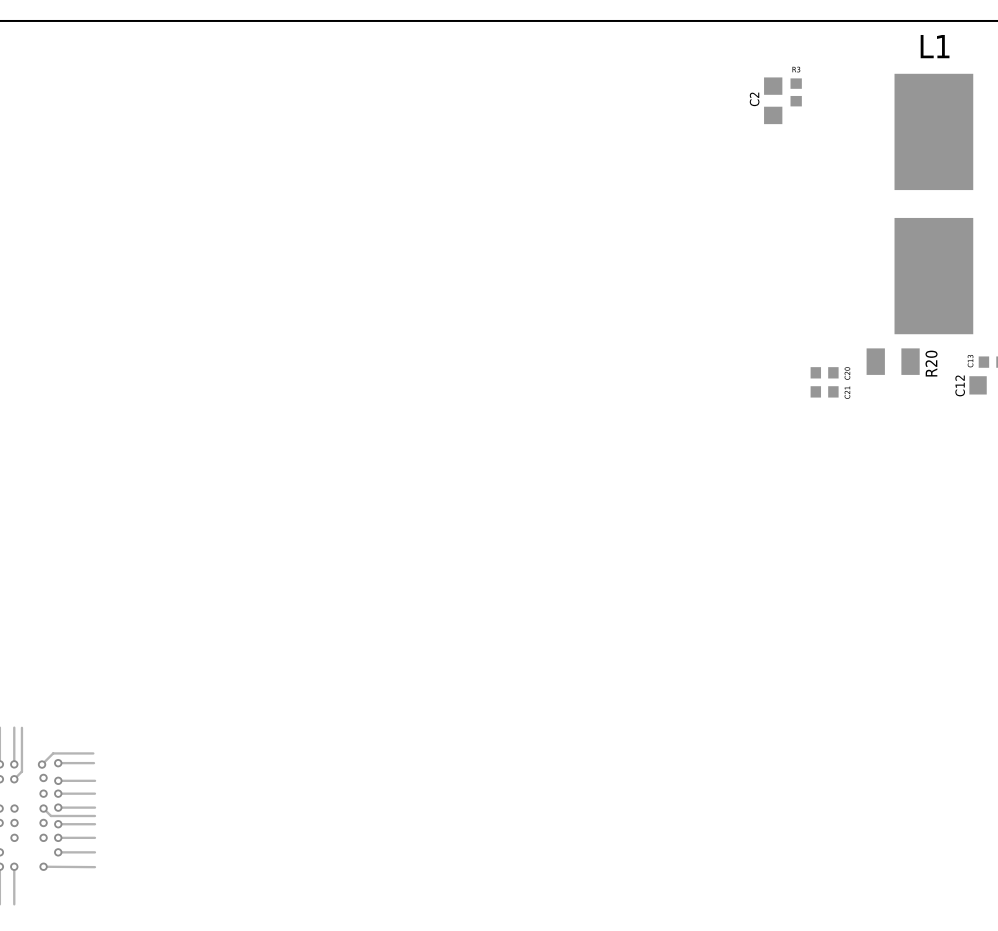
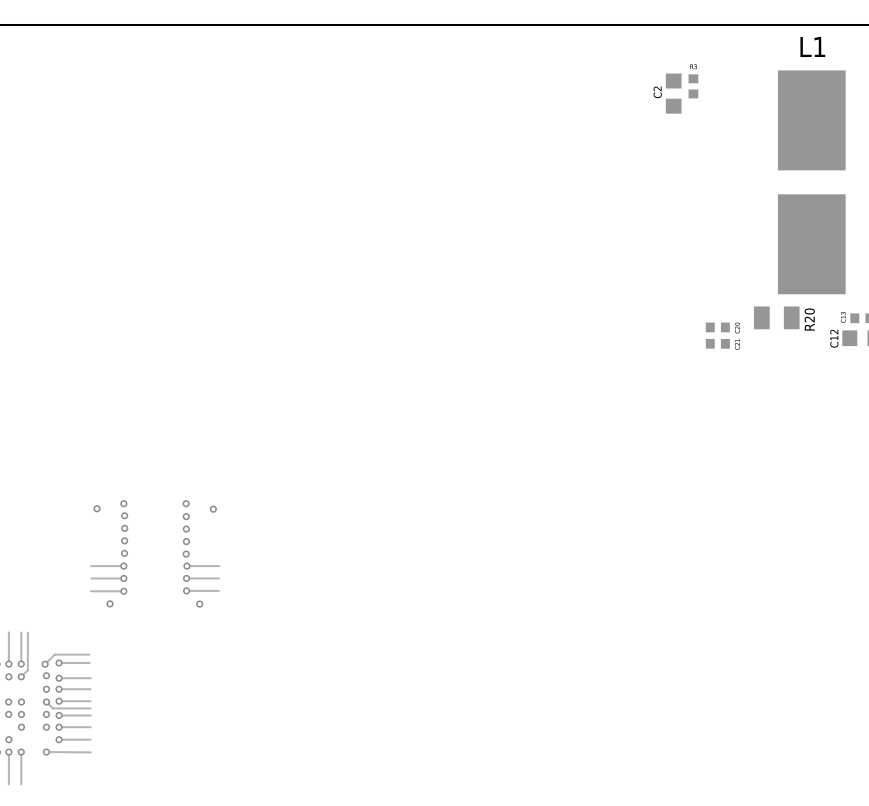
via: none -> (123, 503)
via: none -> (186, 503)
via: none -> (97, 508)
via: none -> (213, 509)
via: none -> (124, 515)
via: none -> (186, 516)
via: none -> (124, 528)
via: none -> (186, 529)
via: none -> (124, 540)
via: none -> (186, 541)
via: none -> (124, 553)
via: none -> (186, 554)
track: none -> (123, 566) (91, 566)
via: none -> (123, 566)
via: none -> (186, 566)
track: none -> (219, 566) (186, 566)
track: none -> (123, 578) (91, 578)
via: none -> (123, 578)
via: none -> (186, 578)
track: none -> (218, 578) (186, 578)
track: none -> (123, 591) (91, 591)
via: none -> (123, 591)
via: none -> (186, 590)
track: none -> (218, 590) (186, 590)
via: none -> (110, 603)
via: none -> (199, 604)

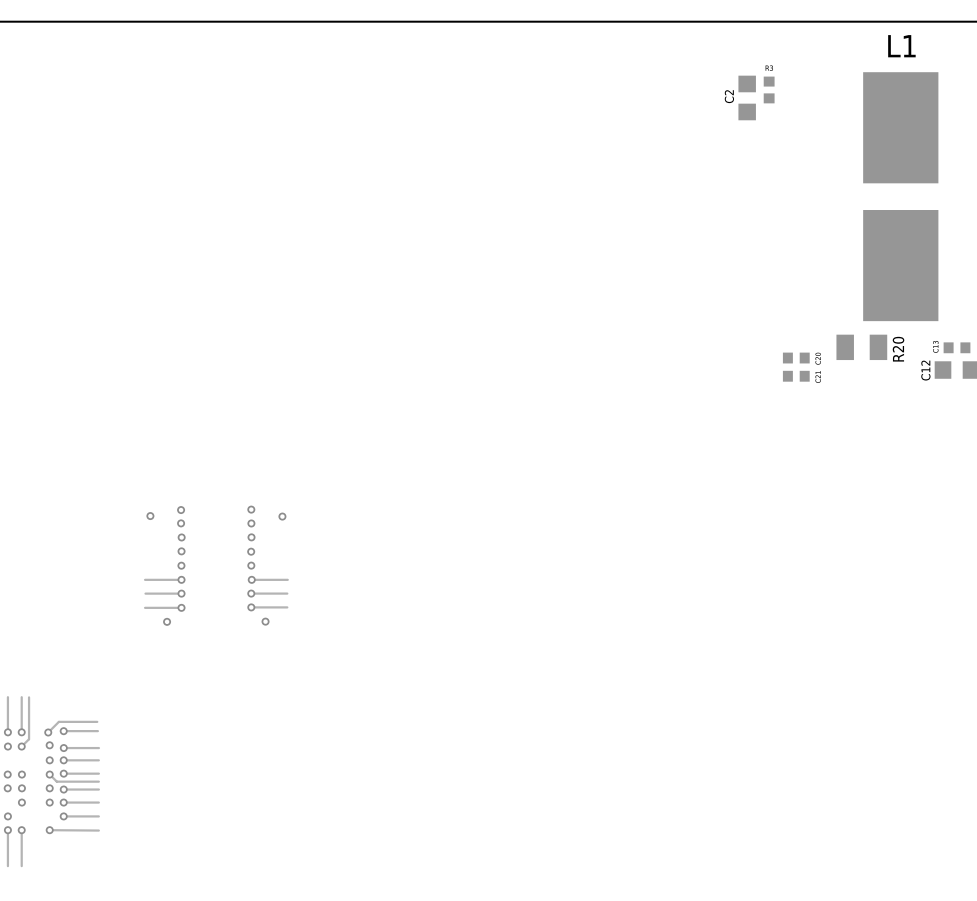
via: none -> (251, 509)
via: none -> (181, 510)
via: none -> (150, 516)
via: none -> (282, 516)
via: none -> (181, 523)
via: none -> (251, 523)
via: none -> (181, 537)
via: none -> (251, 537)
via: none -> (181, 551)
via: none -> (251, 551)
via: (123, 503) -> none
via: (186, 503) -> none
via: (97, 508) -> none
via: (213, 509) -> none
via: none -> (181, 565)
via: none -> (251, 565)
via: (124, 515) -> none
via: (186, 516) -> none
via: none -> (181, 579)
via: none -> (251, 579)
via: (124, 528) -> none
via: (186, 529) -> none
via: none -> (181, 593)
via: none -> (251, 593)
via: (124, 540) -> none
via: (186, 541) -> none
via: none -> (251, 607)
via: none -> (181, 607)
via: (124, 553) -> none
via: (186, 554) -> none
via: none -> (167, 621)
via: none -> (265, 621)
track: (123, 566) (91, 566) -> (181, 579) (145, 579)
via: (123, 566) -> none
via: (186, 566) -> none
track: (219, 566) (186, 566) -> (287, 579) (251, 579)
track: (123, 578) (91, 578) -> (181, 593) (145, 593)
via: (123, 578) -> none
via: (186, 578) -> none
track: (218, 578) (186, 578) -> (287, 593) (251, 593)
via: (186, 590) -> none
track: (218, 590) (186, 590) -> (287, 607) (251, 607)
track: (123, 591) (91, 591) -> (181, 607) (145, 607)
via: (123, 591) -> none
via: (110, 603) -> none
via: (199, 604) -> none

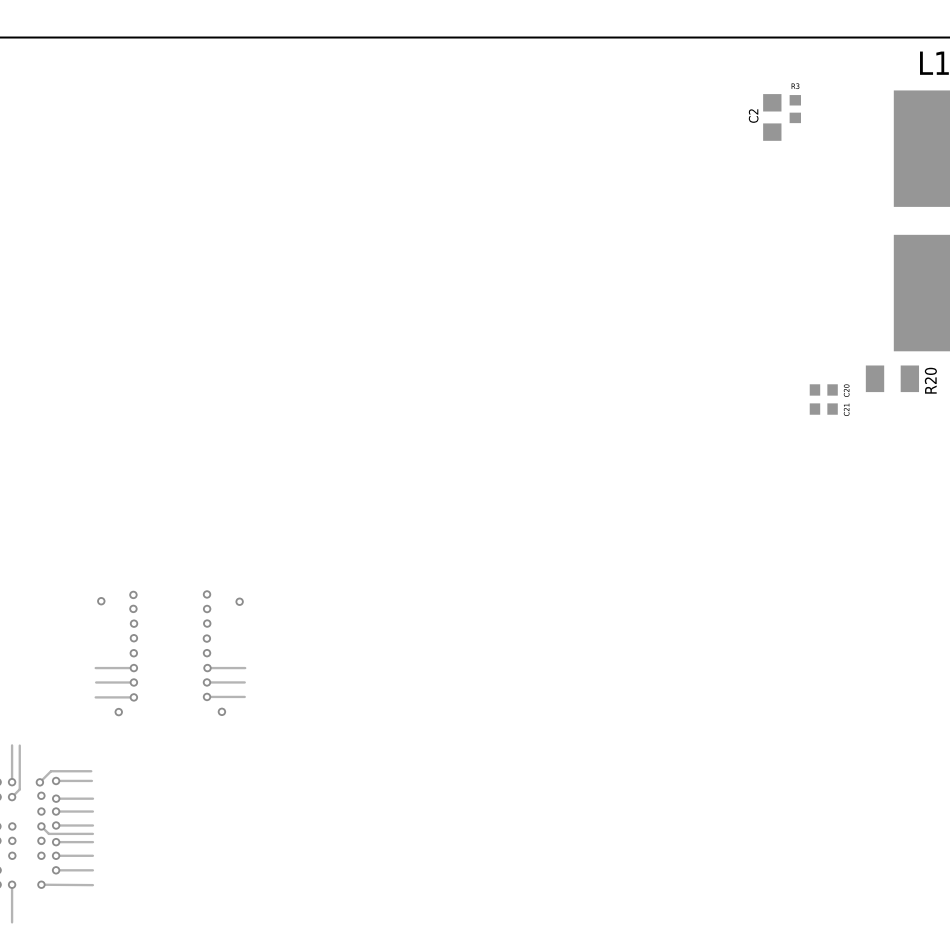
via: (251, 509) -> none
via: (181, 510) -> none
via: (150, 516) -> none
via: (282, 516) -> none
via: (181, 523) -> none
via: (251, 523) -> none
via: (181, 537) -> none
via: (251, 537) -> none
via: (181, 551) -> none
via: (251, 551) -> none
via: none -> (133, 594)
via: none -> (207, 594)
via: none -> (101, 601)
via: none -> (239, 601)
via: (181, 565) -> none
via: (251, 565) -> none
via: none -> (133, 608)
via: none -> (207, 608)
track: (181, 579) (145, 579) -> (133, 668) (95, 668)
via: (181, 579) -> none
via: (251, 579) -> none
track: (287, 579) (251, 579) -> (245, 668) (207, 668)
via: none -> (207, 623)
via: none -> (134, 623)
track: (181, 593) (145, 593) -> (133, 682) (96, 682)
via: (181, 593) -> none
via: (251, 593) -> none
track: (287, 593) (251, 593) -> (244, 682) (206, 682)
via: none -> (133, 638)
via: none -> (206, 638)
track: (181, 607) (145, 607) -> (133, 697) (95, 697)
via: (181, 607) -> none
via: (251, 607) -> none
track: (287, 607) (251, 607) -> (244, 696) (207, 696)
via: none -> (133, 653)
via: none -> (207, 653)
via: (167, 621) -> none
via: (265, 621) -> none
via: none -> (133, 668)
via: none -> (207, 668)
via: none -> (133, 682)
via: none -> (206, 682)
via: none -> (207, 696)
via: none -> (133, 697)
via: none -> (118, 712)
via: none -> (221, 711)

